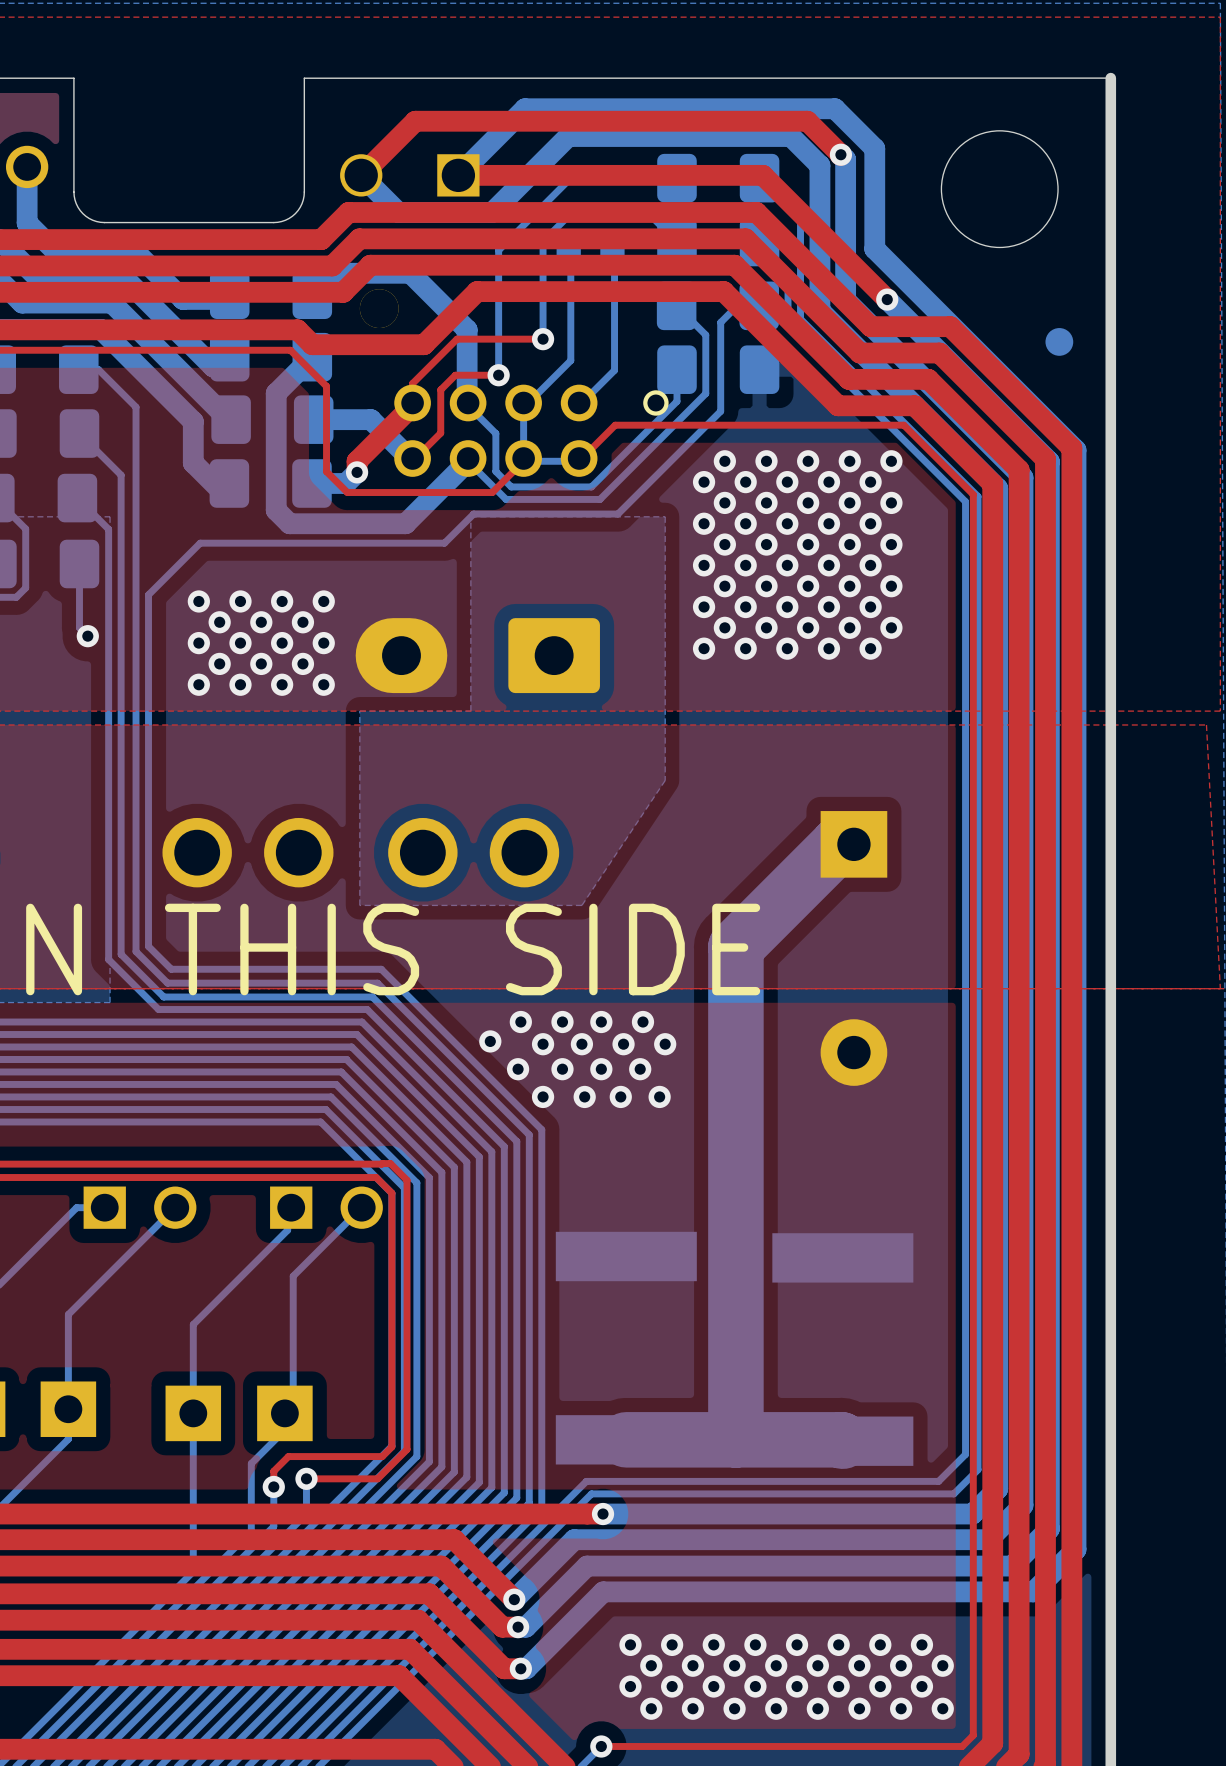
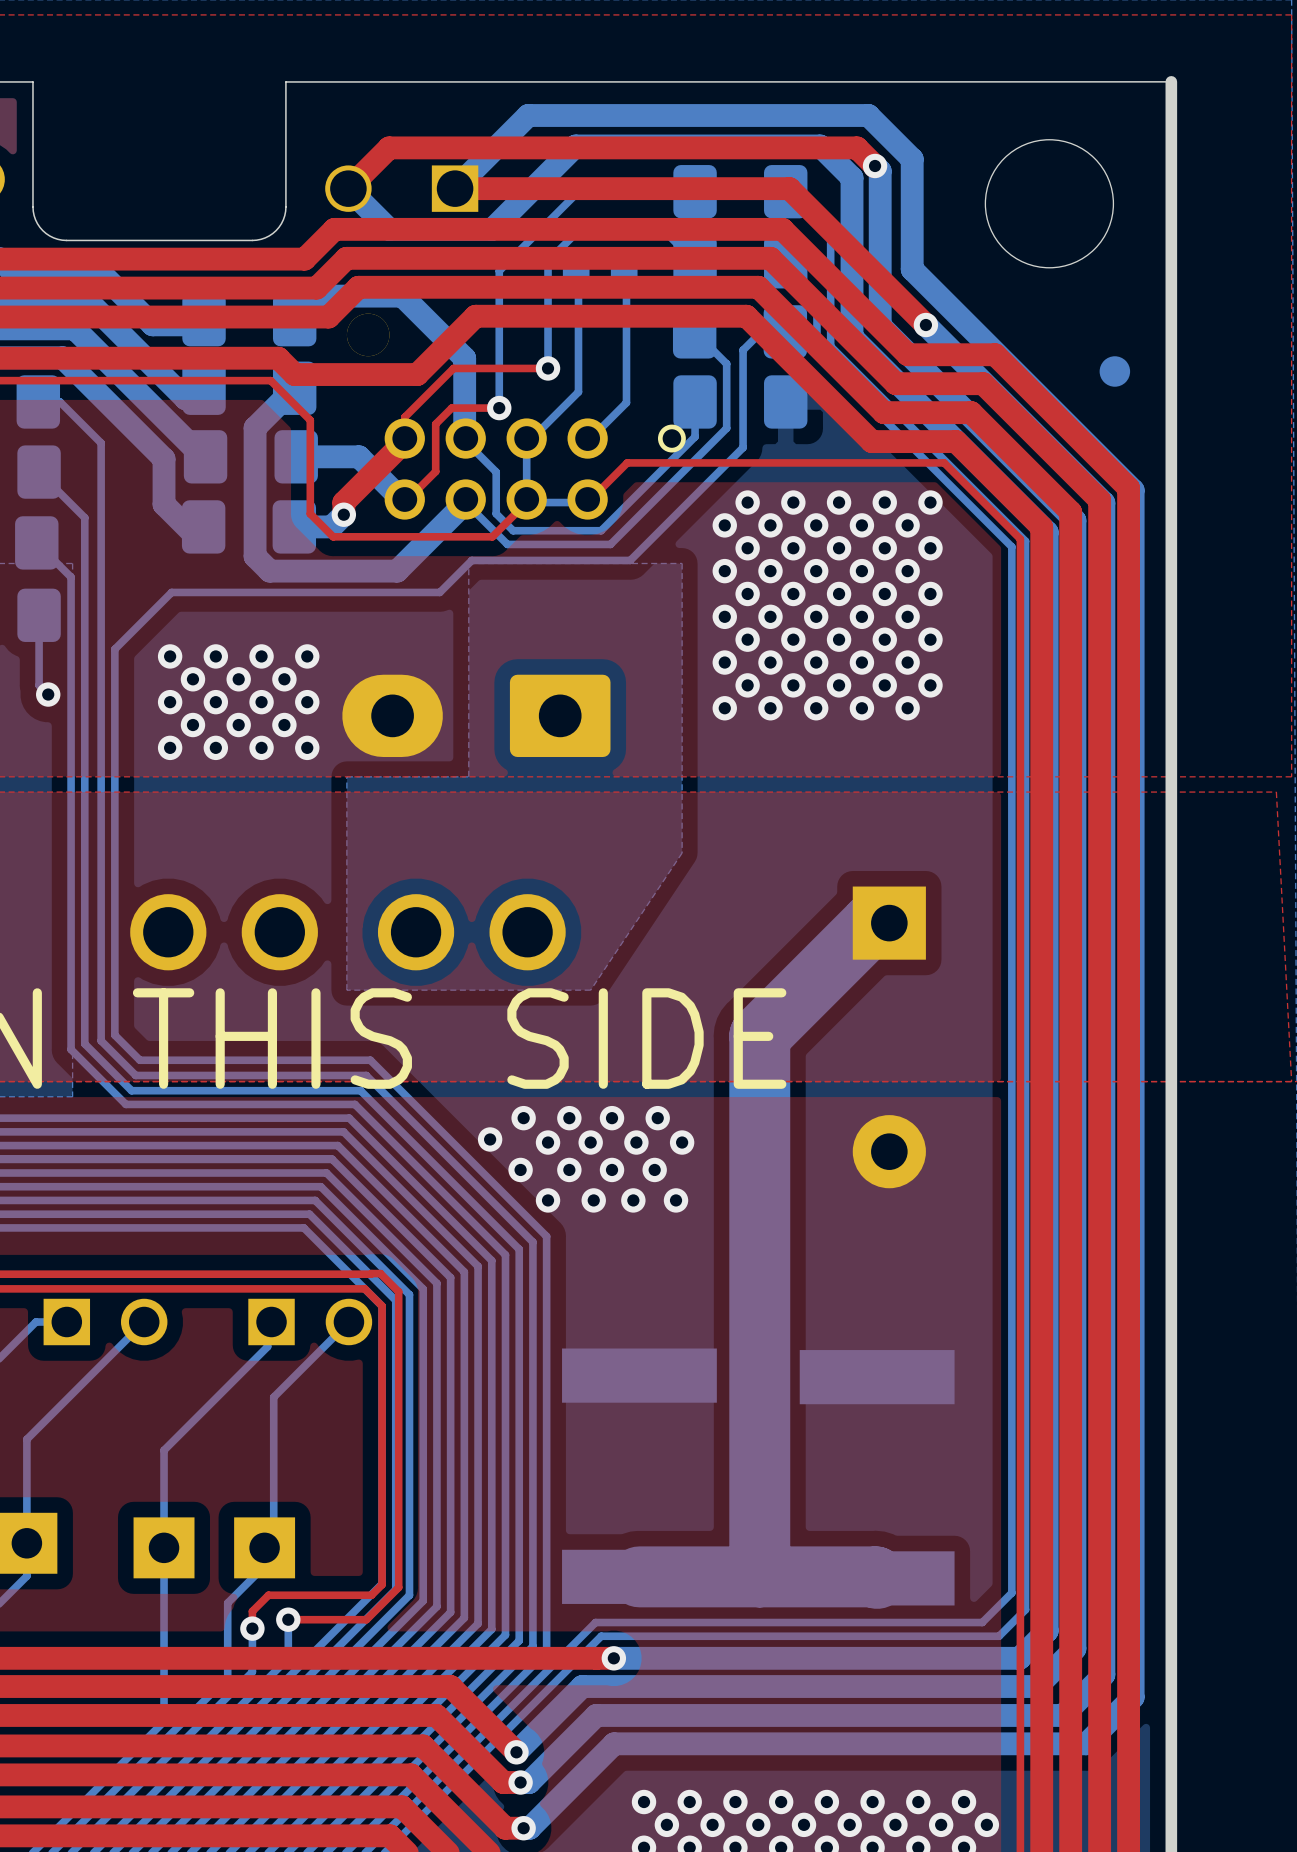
top track: (398, 138) (415, 121) (807, 121) (840, 154) -> (389, 147) (856, 147) (875, 165)

